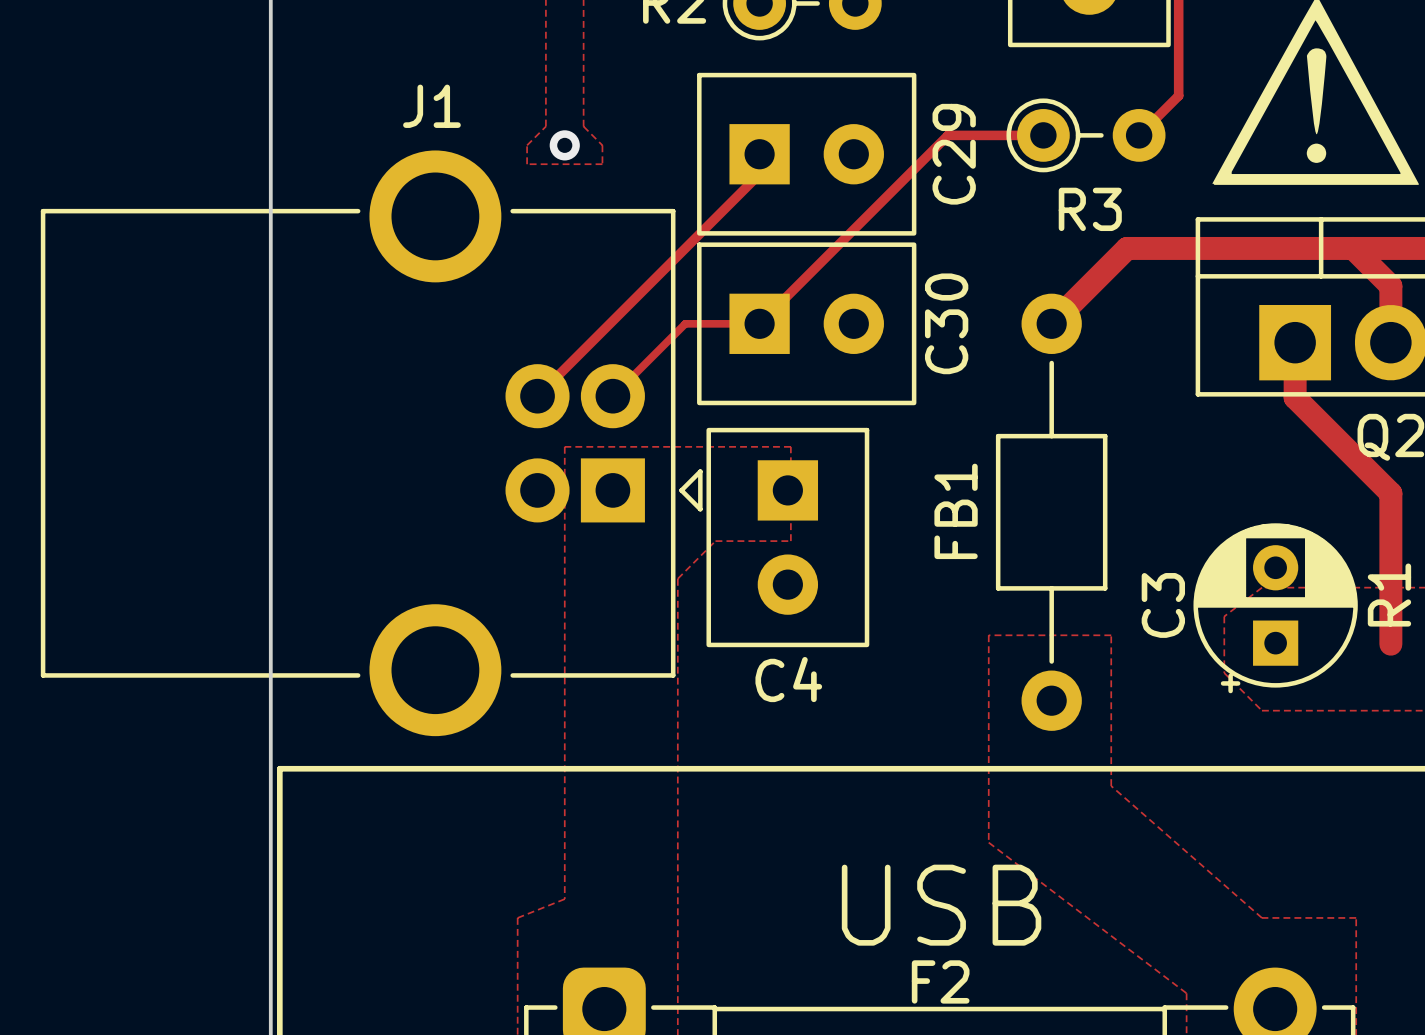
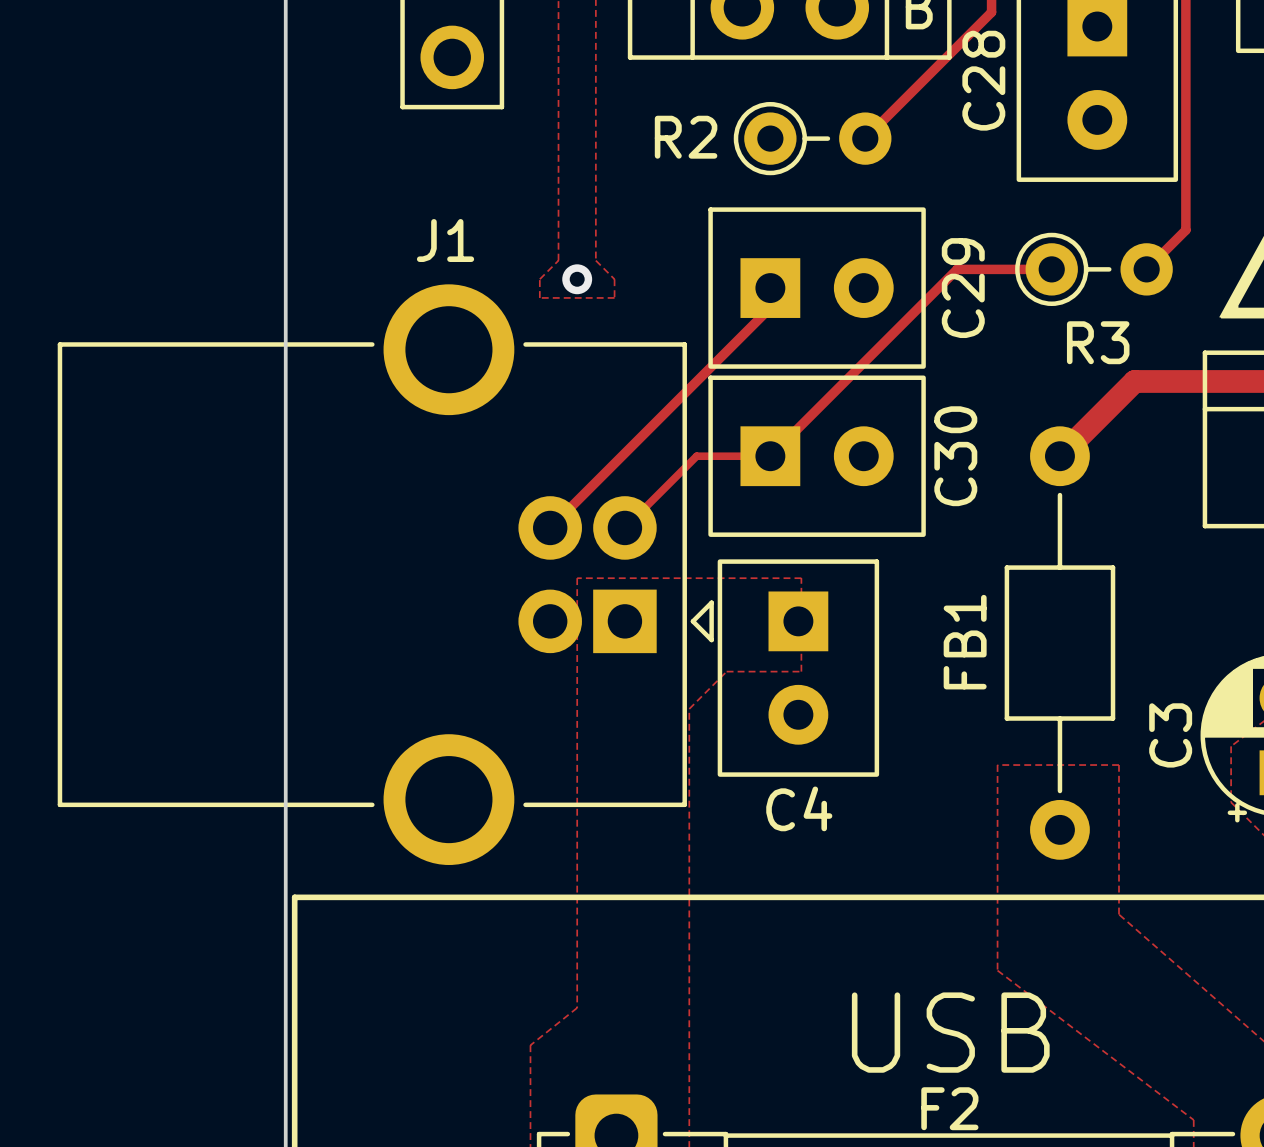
zone outline: (564, 880) (564, 899) (517, 917) -> (577, 1007) (530, 1045)

